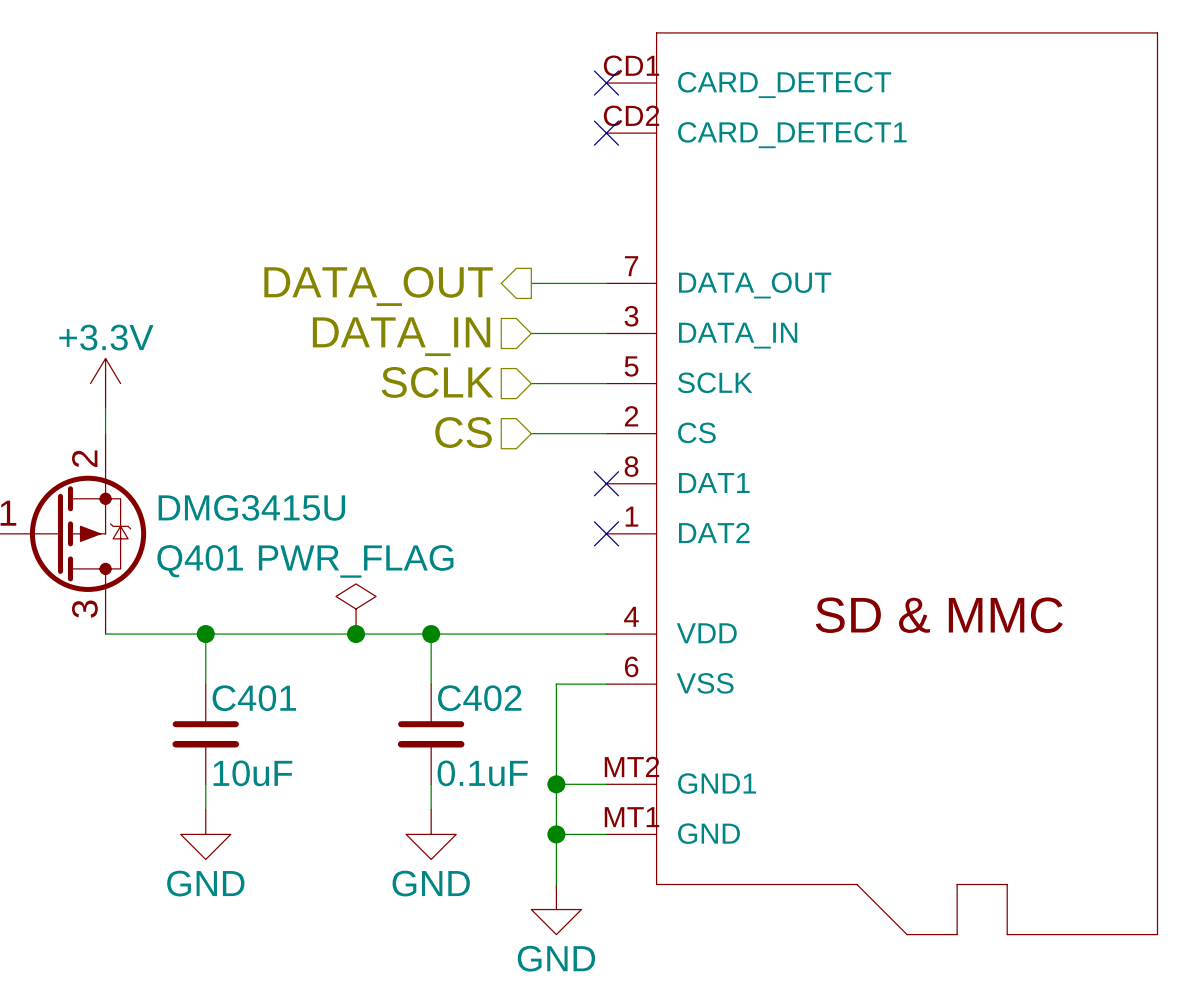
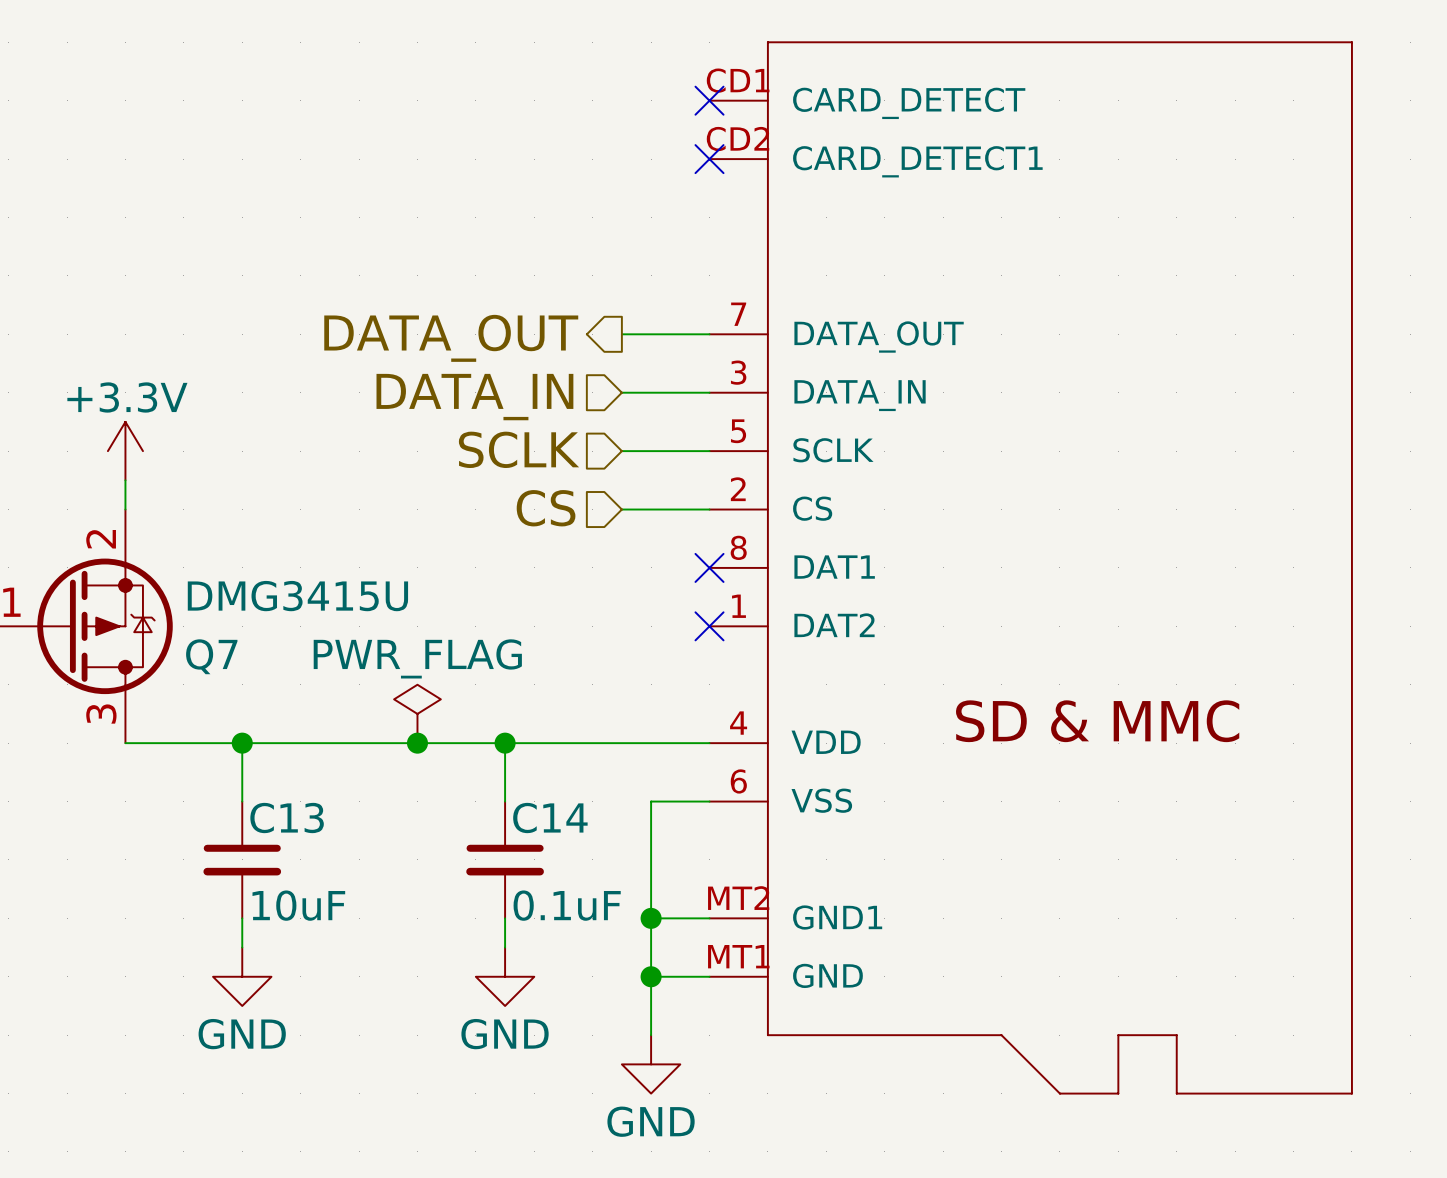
Q401 name: Q401 (200, 561) -> Q7 (211, 656)
C401 name: C401 (254, 698) -> C13 (287, 818)
C402 name: C402 (479, 698) -> C14 (550, 818)

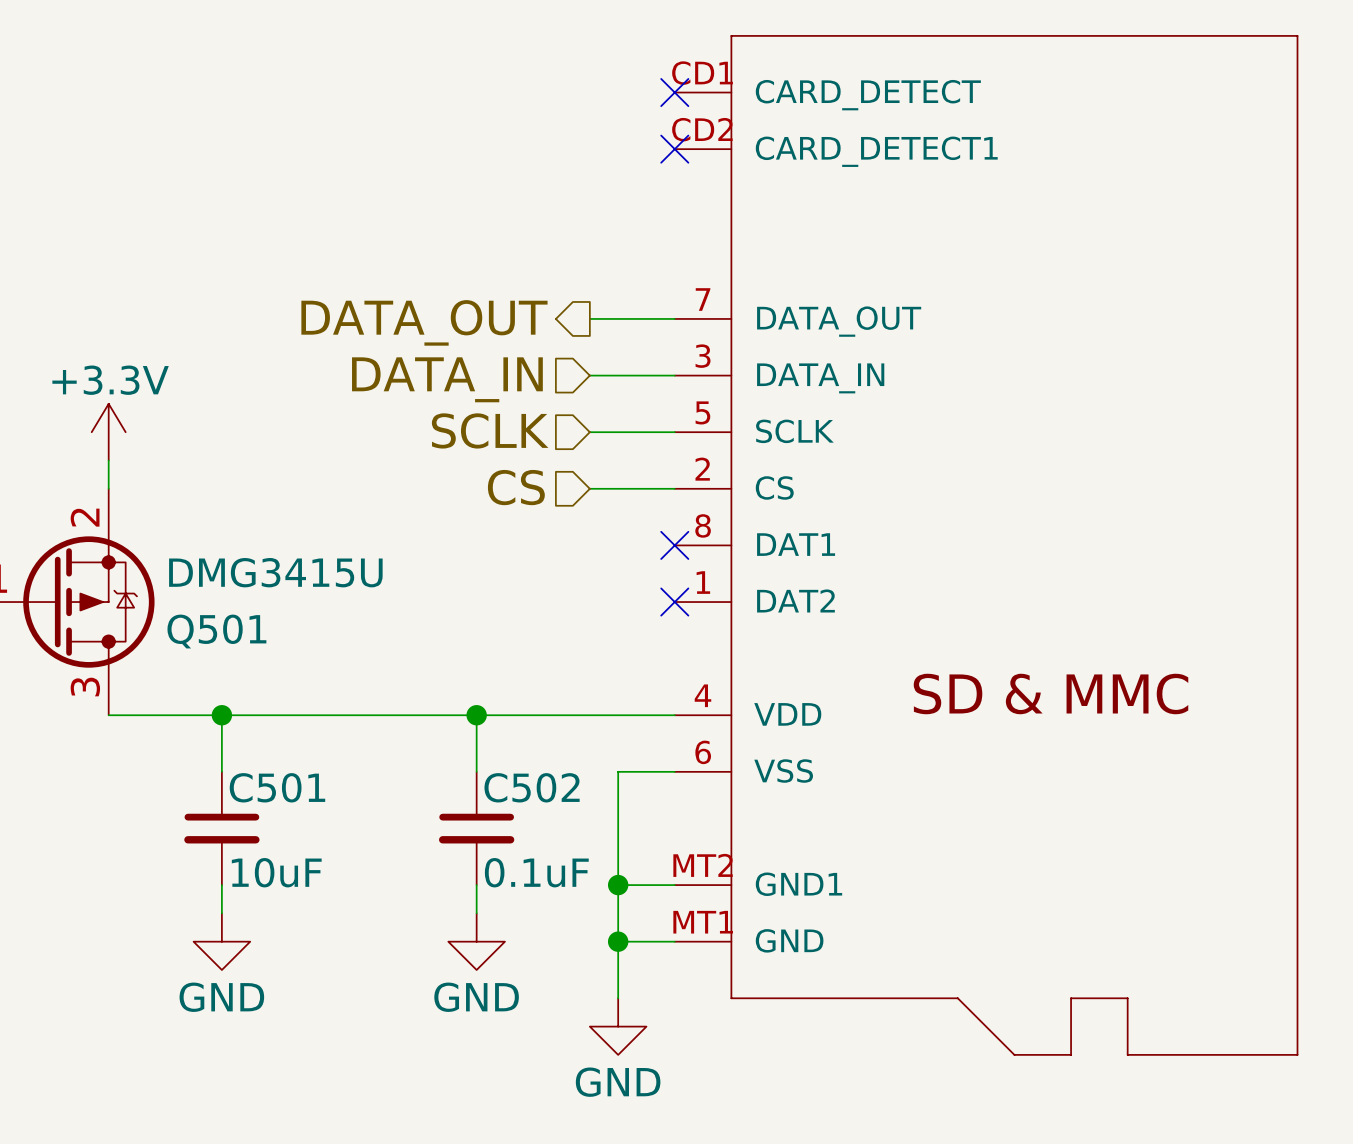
Q7 name: Q7 (211, 656) -> Q501 (216, 631)
power symbol: PWR_FLAG (417, 713) -> none
junction: (417, 743) -> none
C13 name: C13 (287, 818) -> C501 (277, 787)
C14 name: C14 (550, 818) -> C502 (532, 787)

